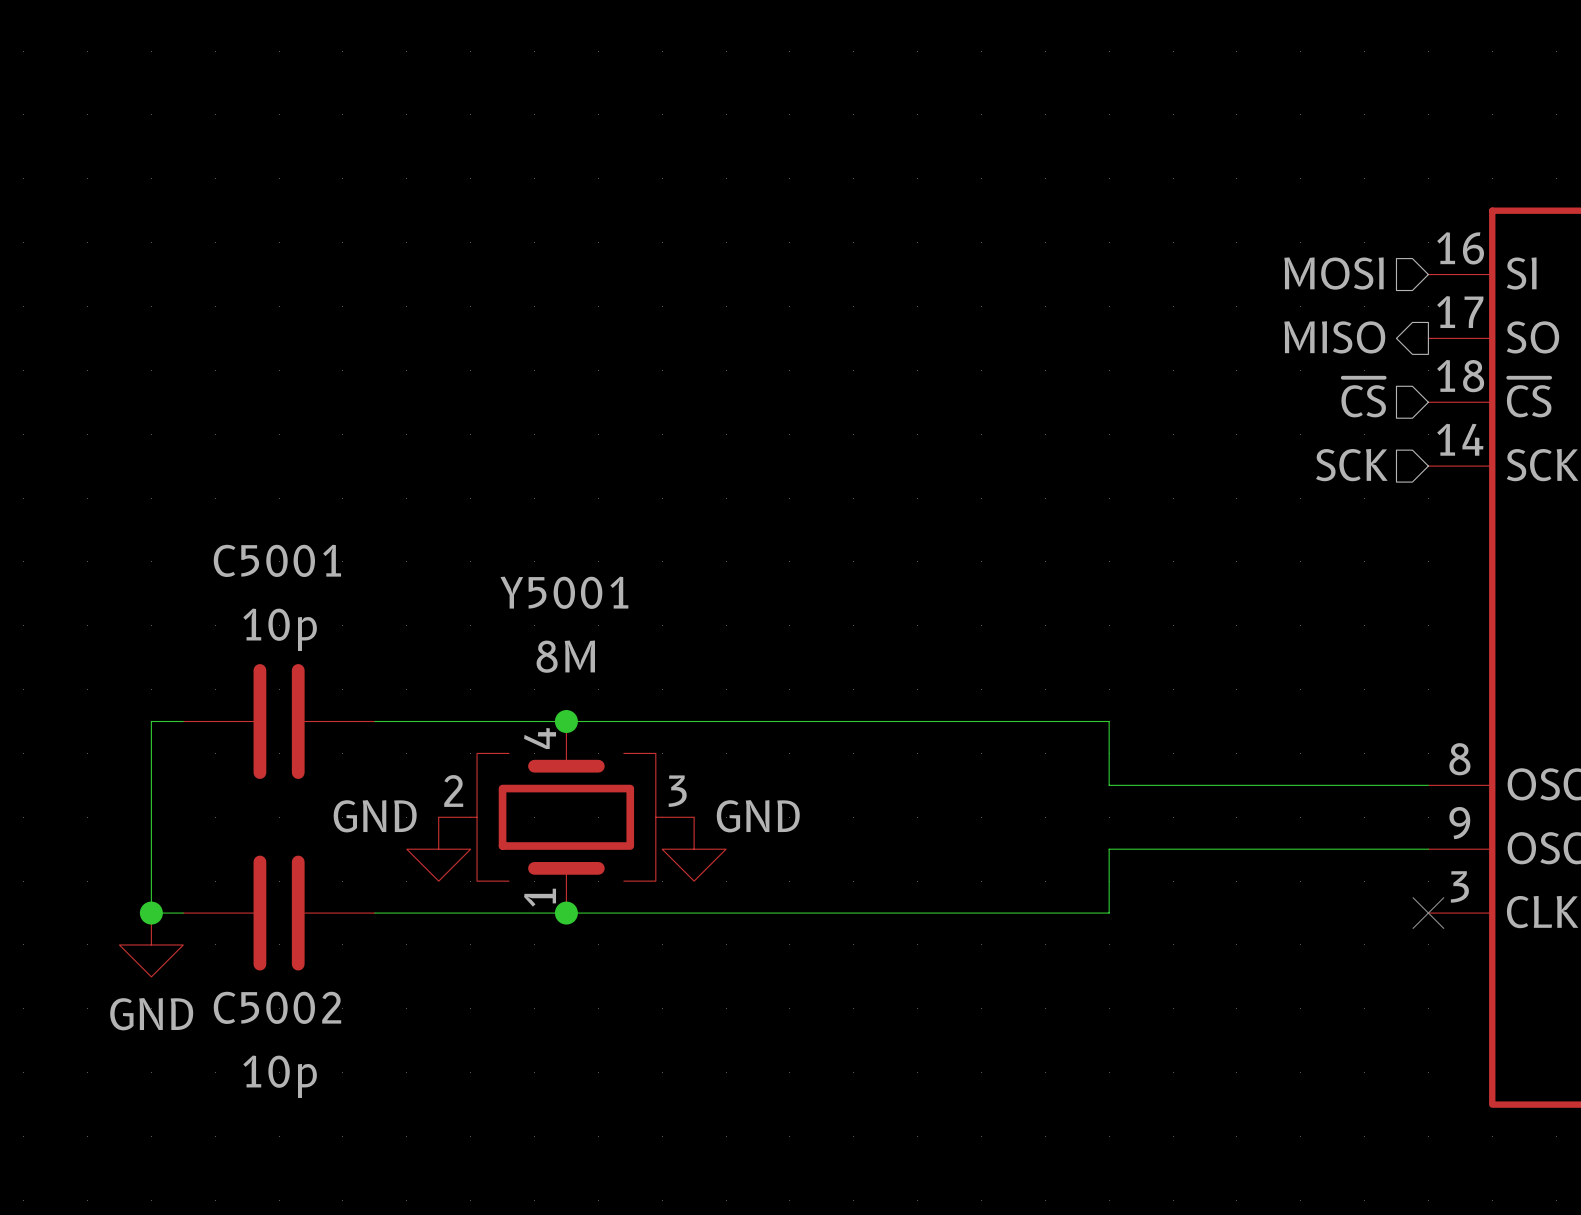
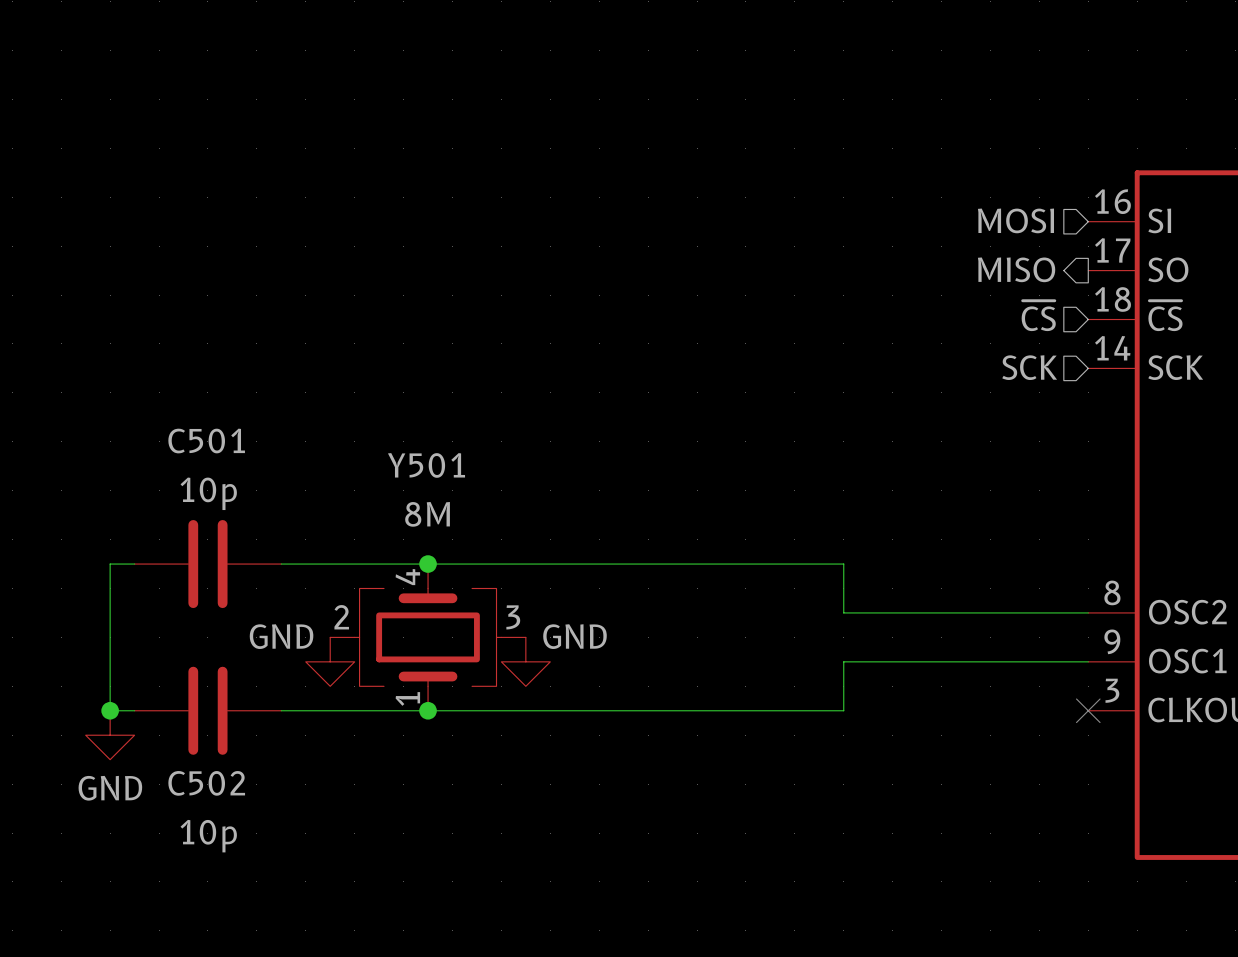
C5001 name: C5001 (277, 560) -> C501 (206, 440)
Y5001 name: Y5001 (564, 592) -> Y501 (426, 465)
C5002 name: C5002 (277, 1007) -> C502 (206, 783)

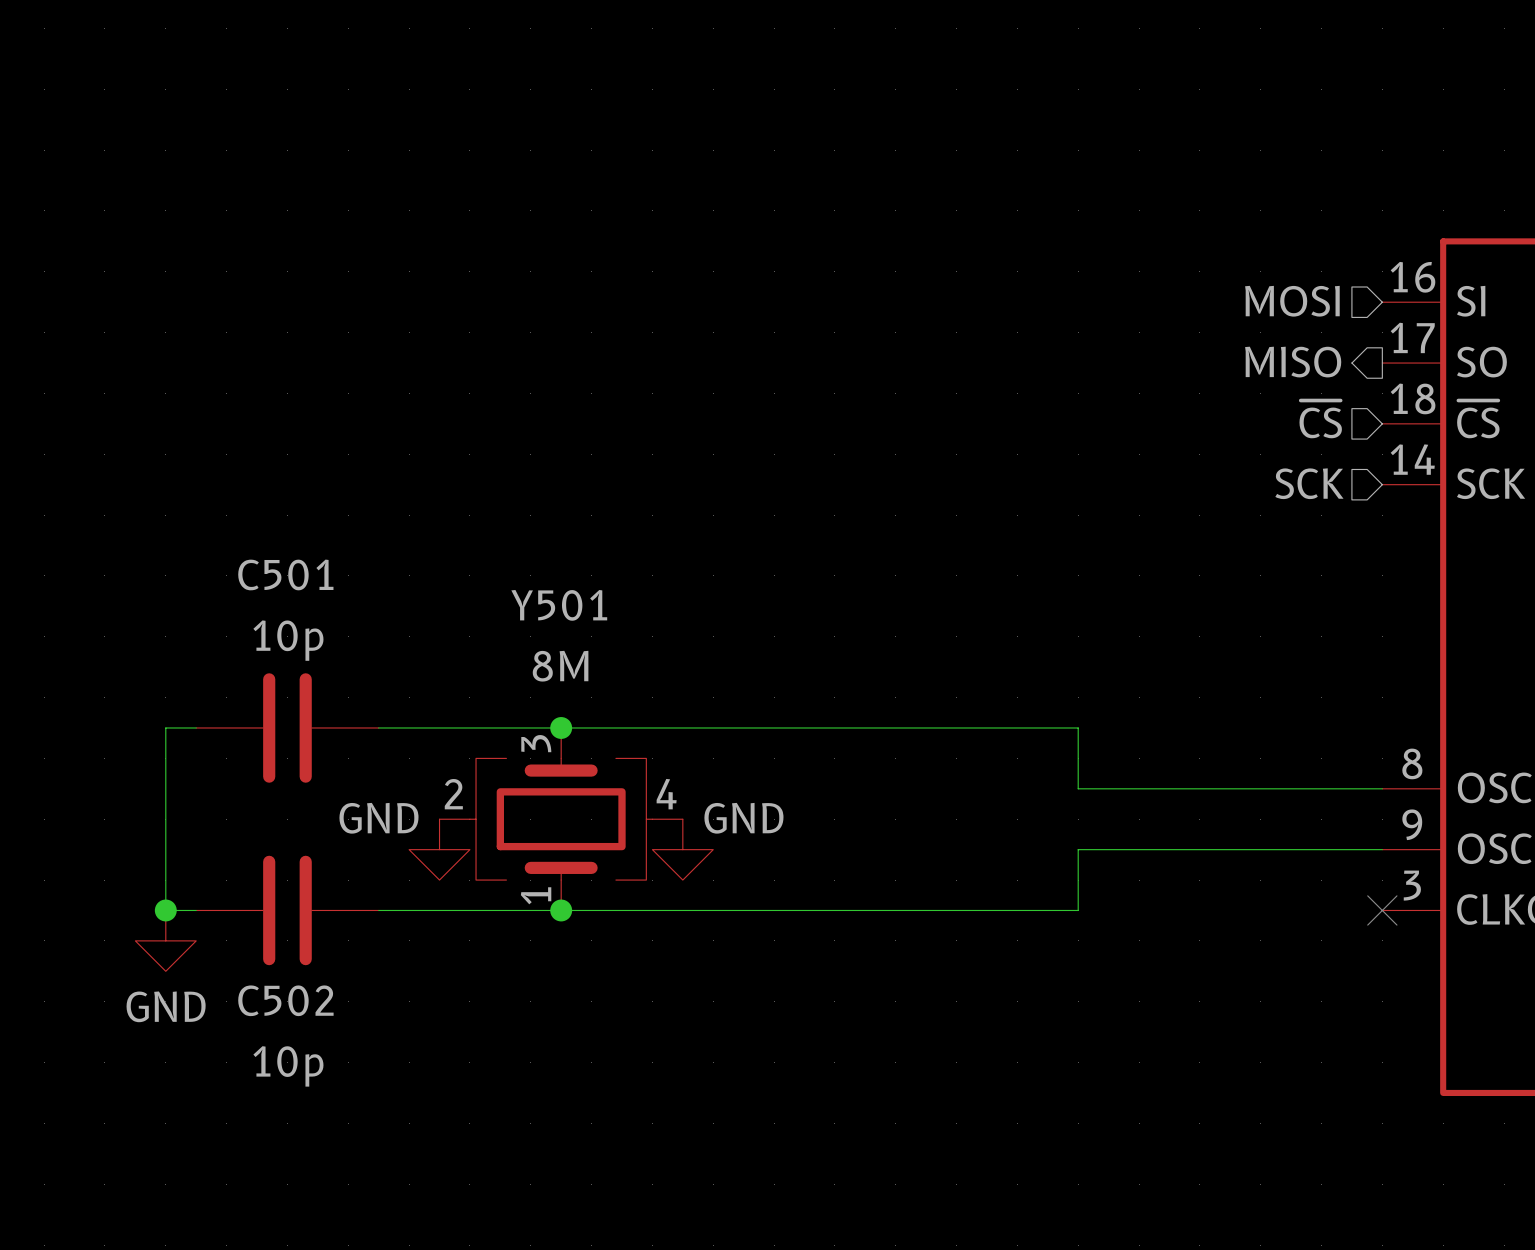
Y501 pin number: 4 (407, 577) -> 3 (536, 743)
Y501 pin number: 3 (513, 617) -> 4 (666, 794)

